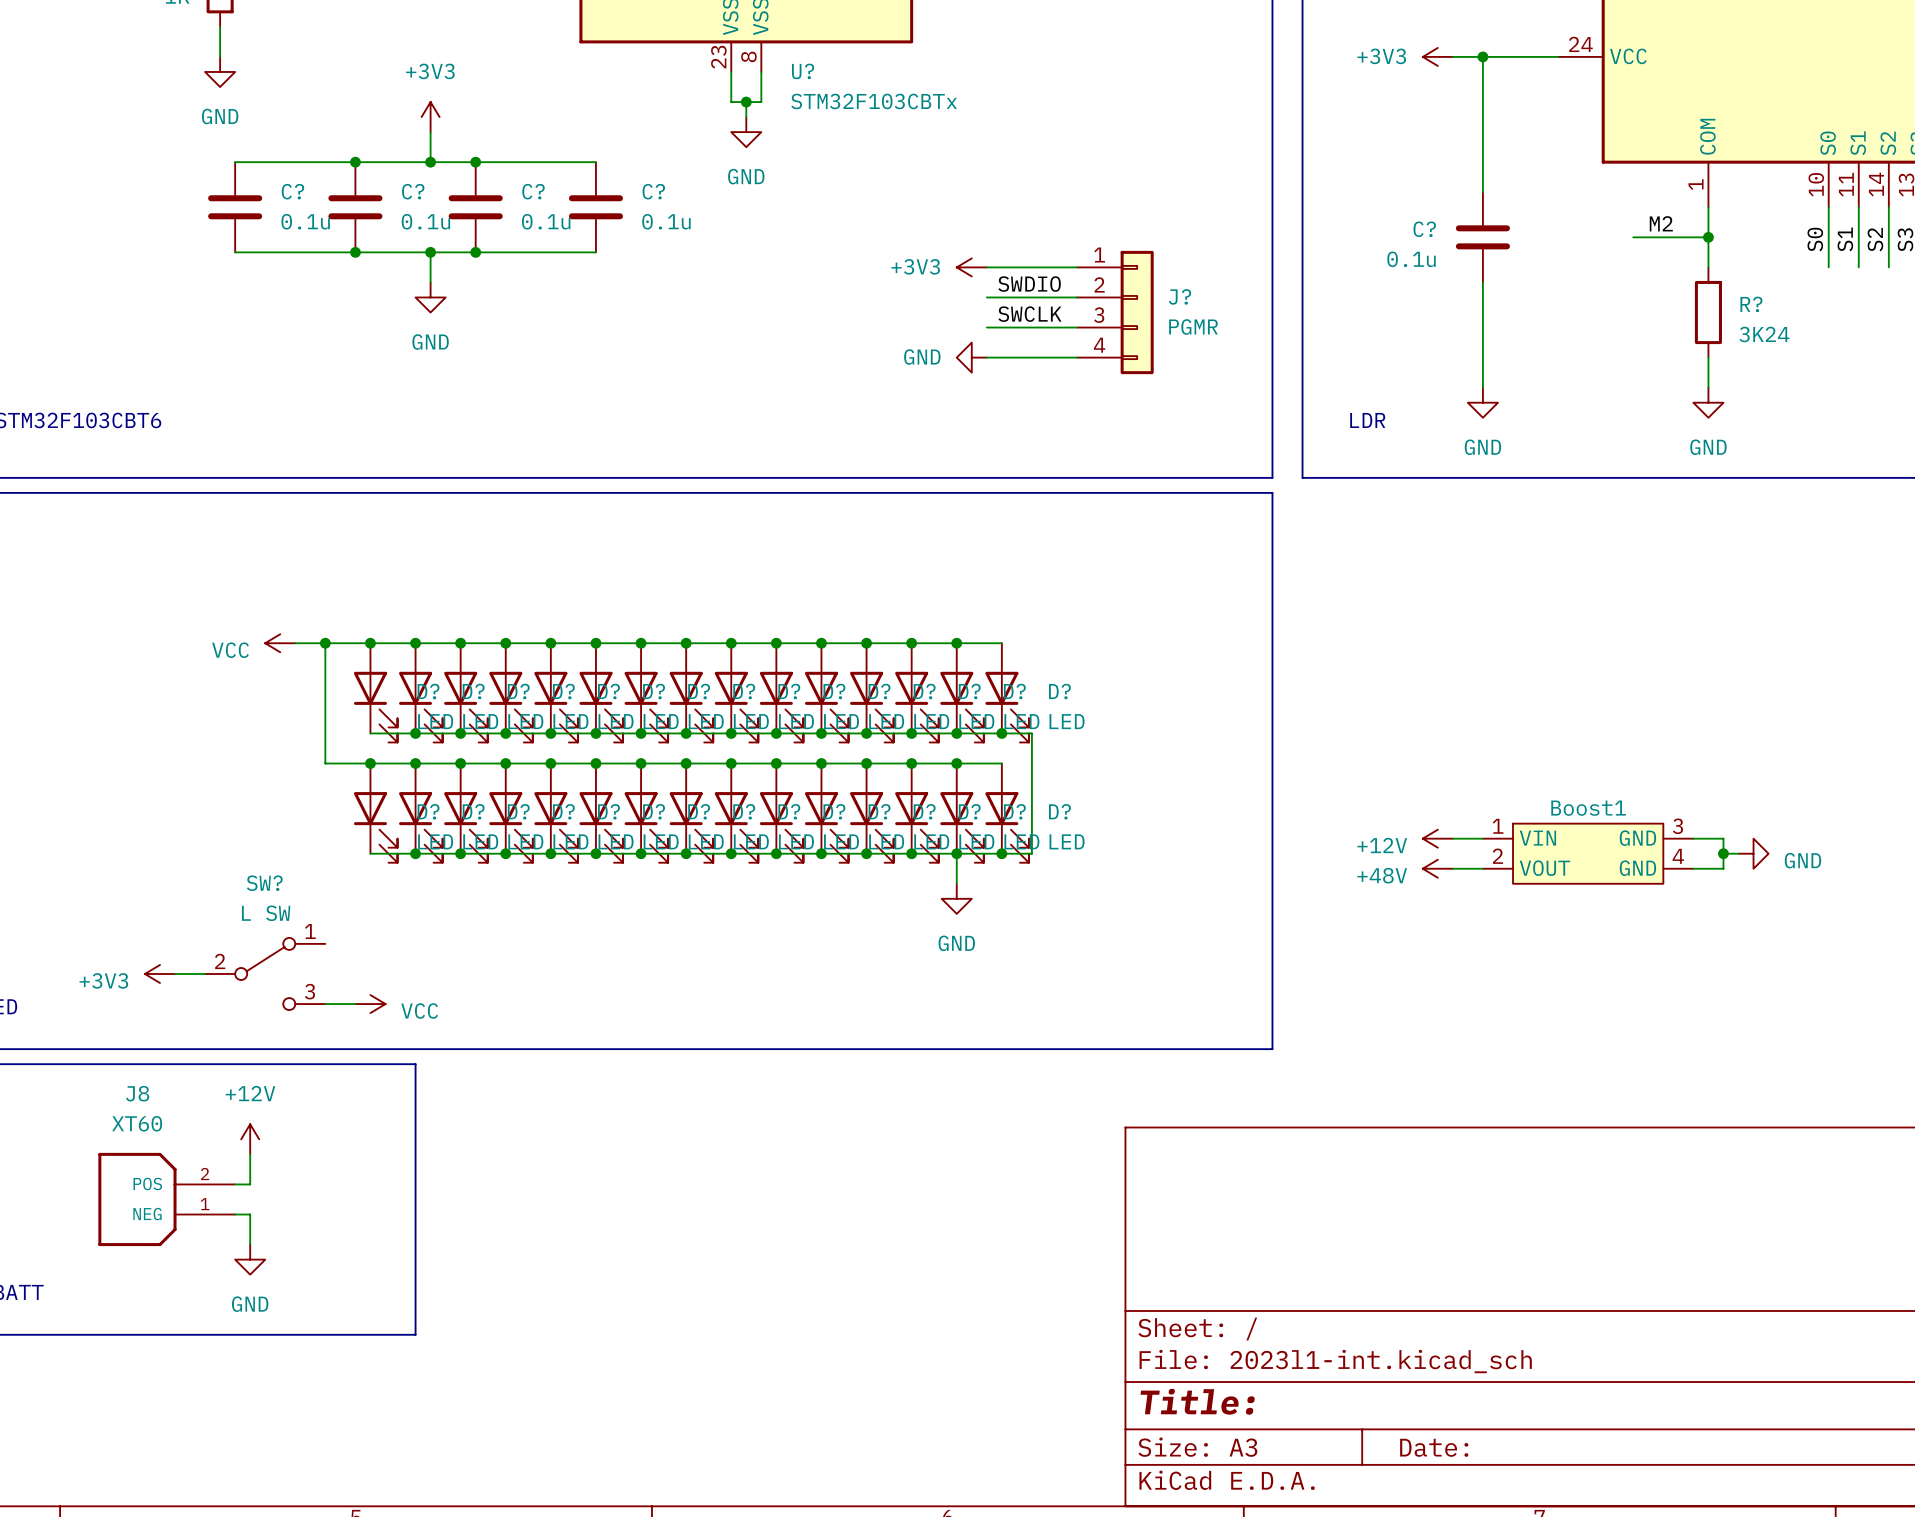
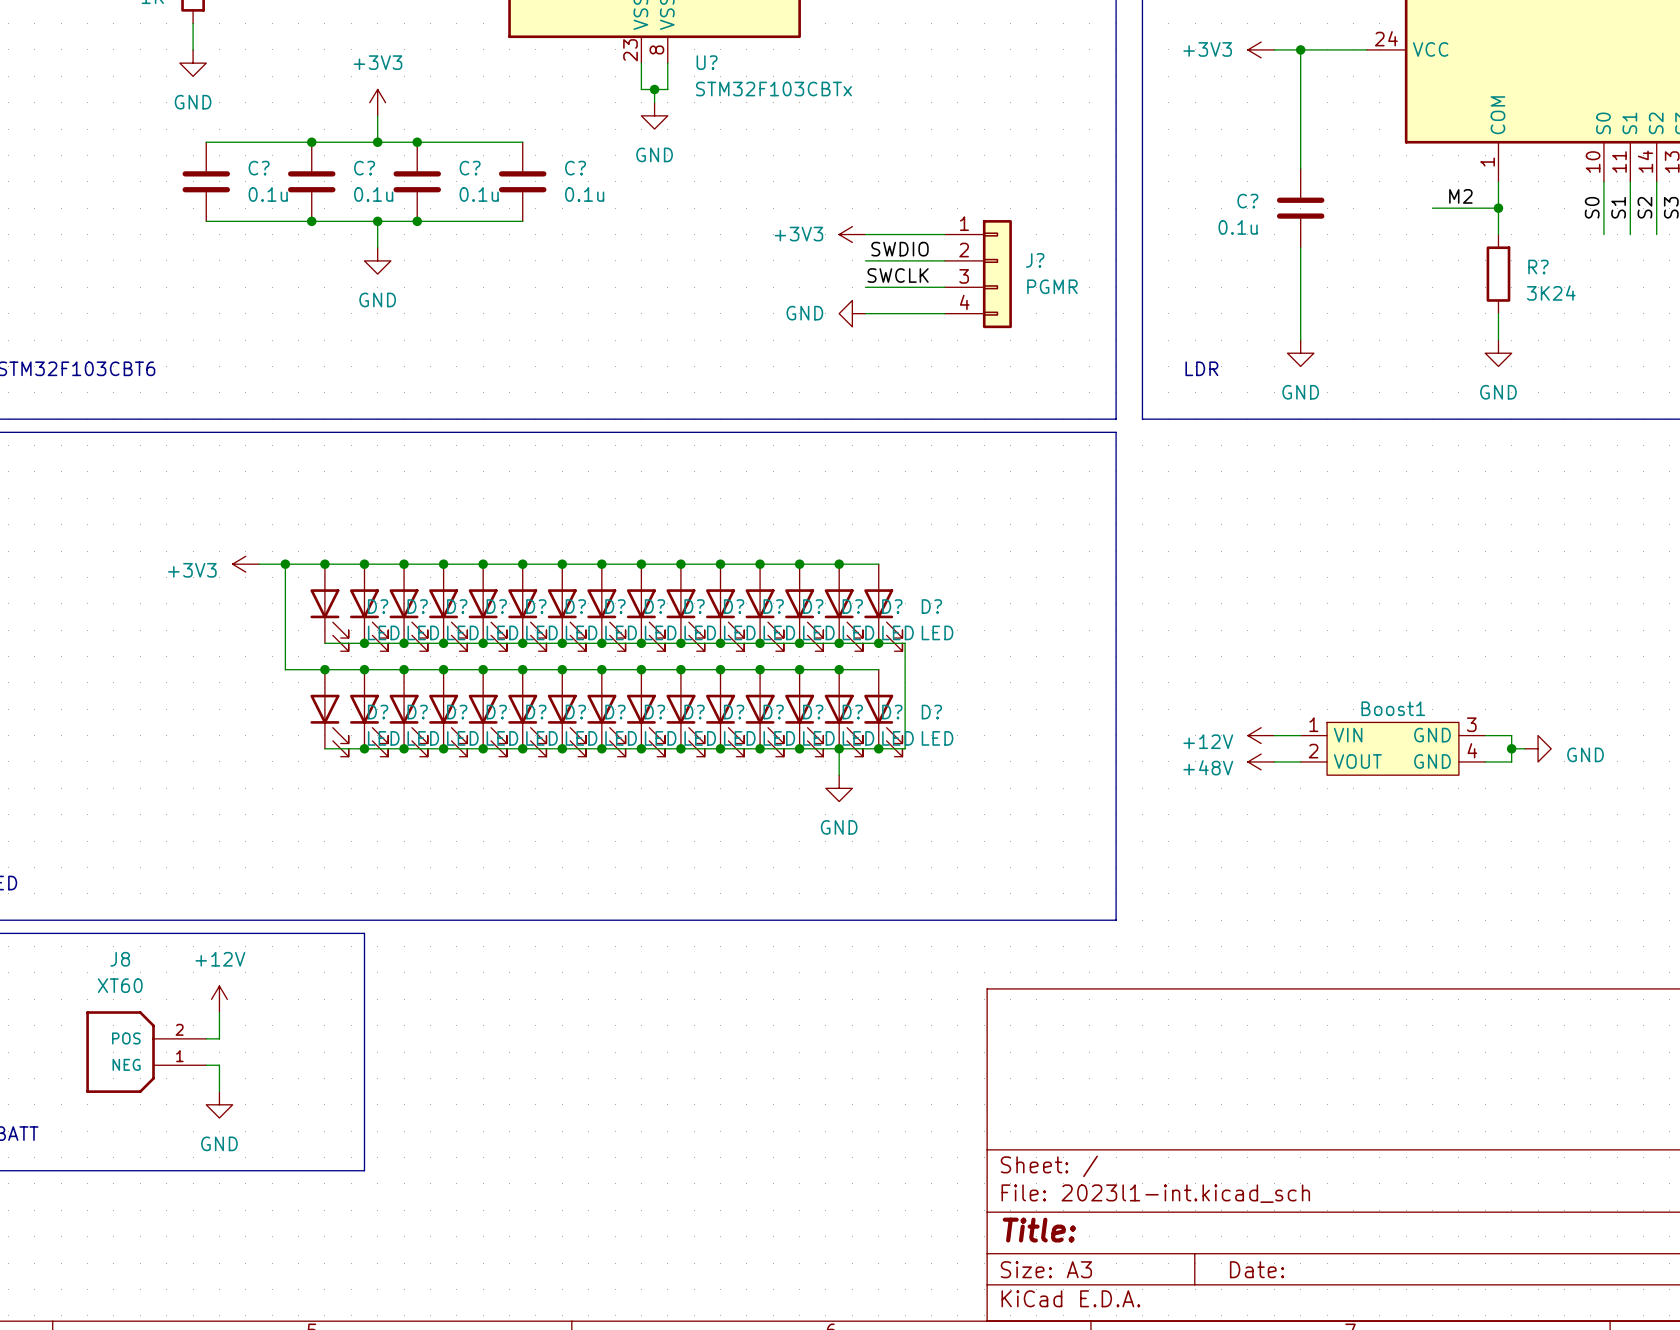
power symbol: VCC (280, 643) -> +3V3 (245, 564)
power symbol: +3V3 (159, 973) -> none
wire: (175, 973) (205, 973) -> none
SW?: L SW (265, 973) -> none
wire: (325, 1004) (355, 1004) -> none
power symbol: VCC (370, 1004) -> none

